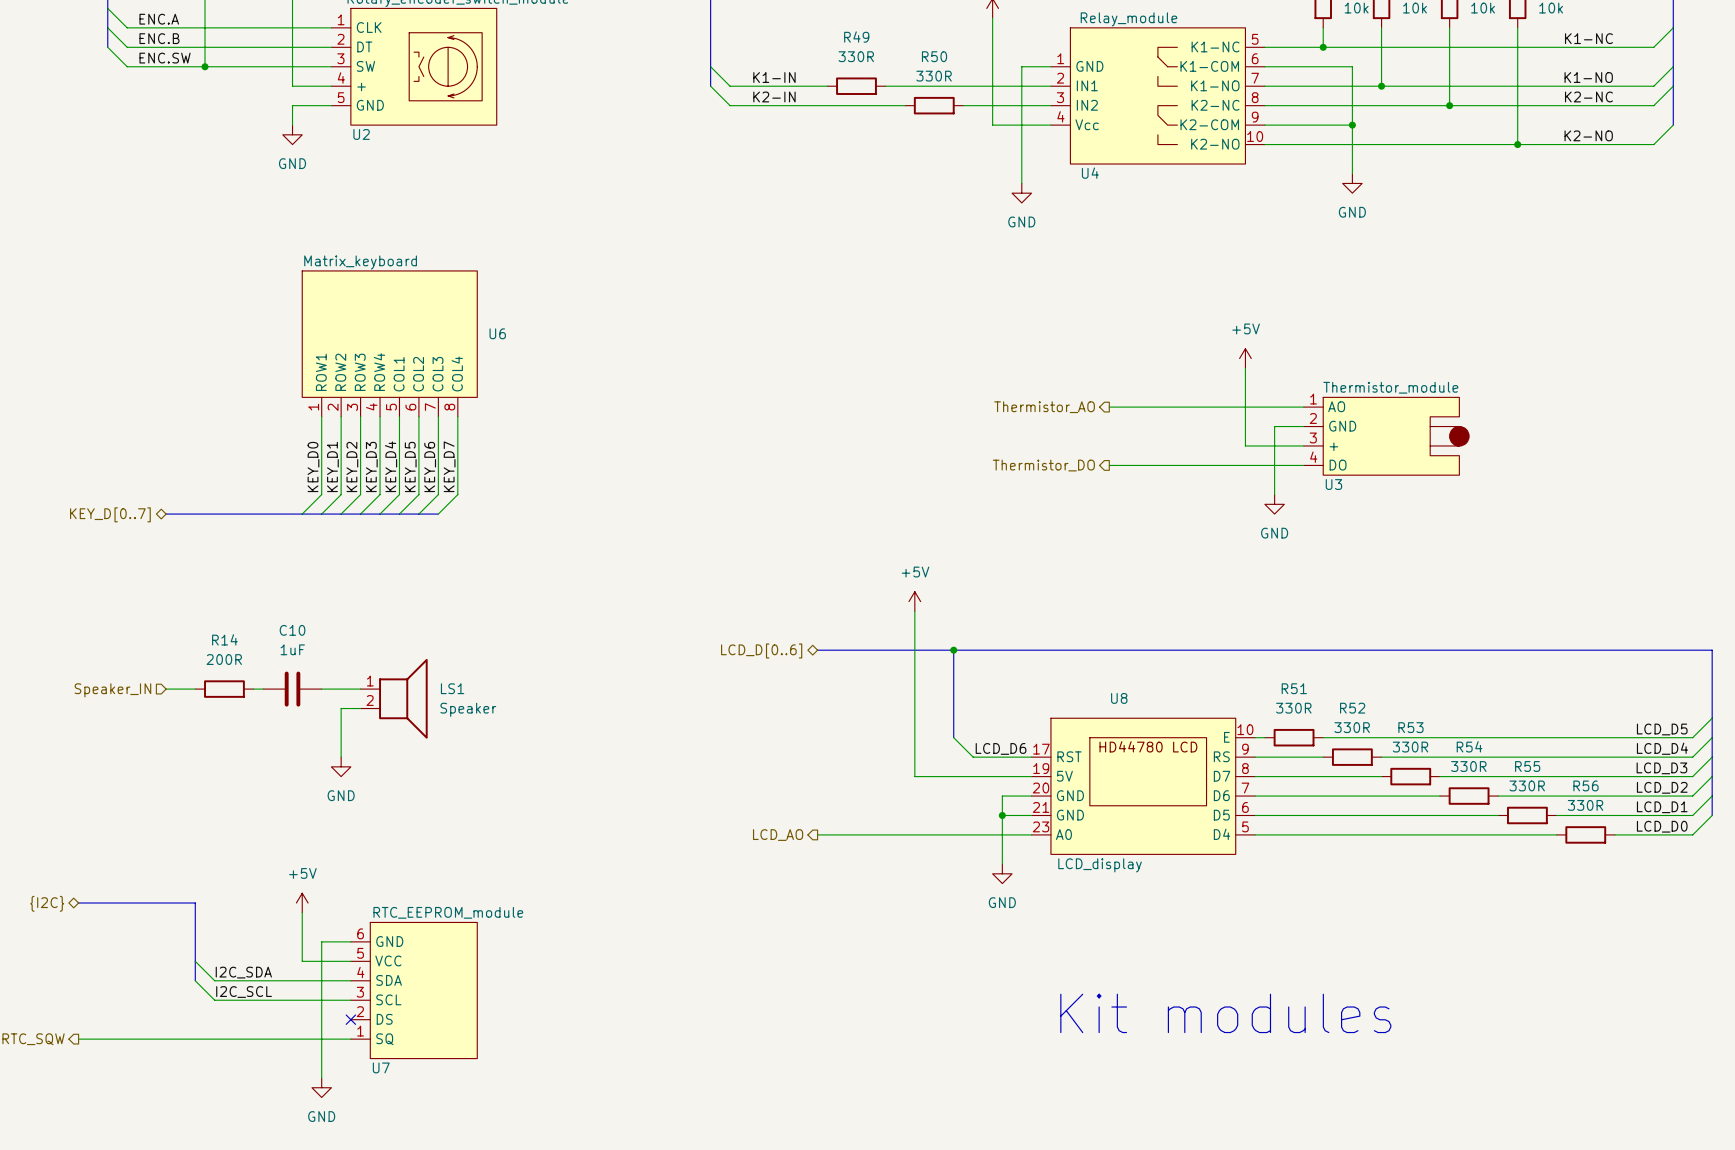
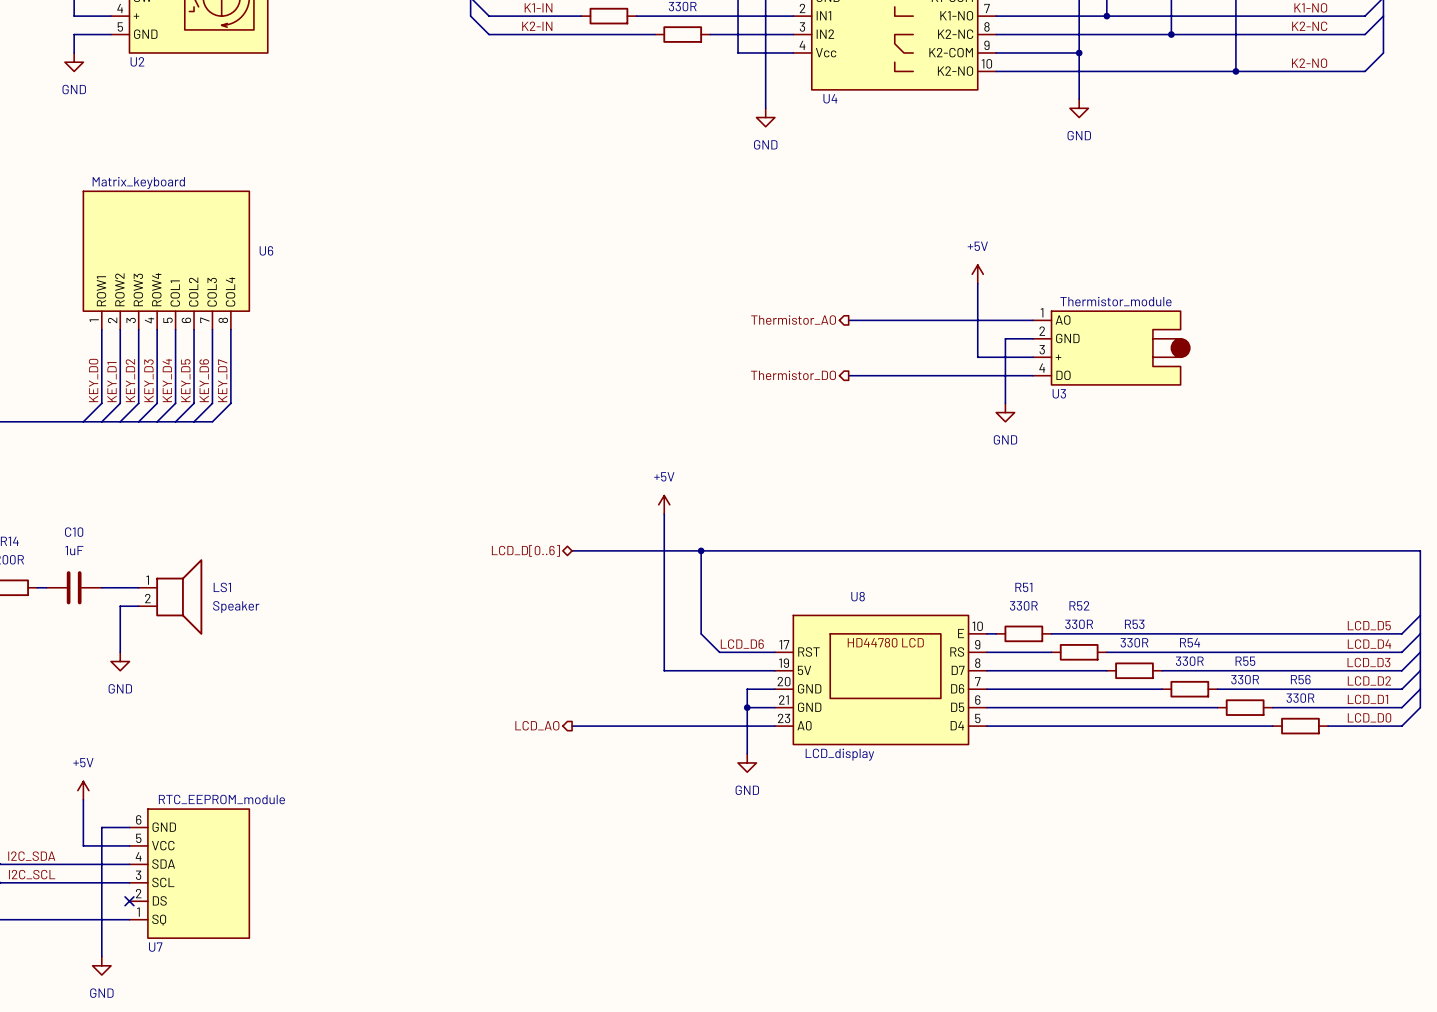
text: Kit modules (1225, 1013) -> none

